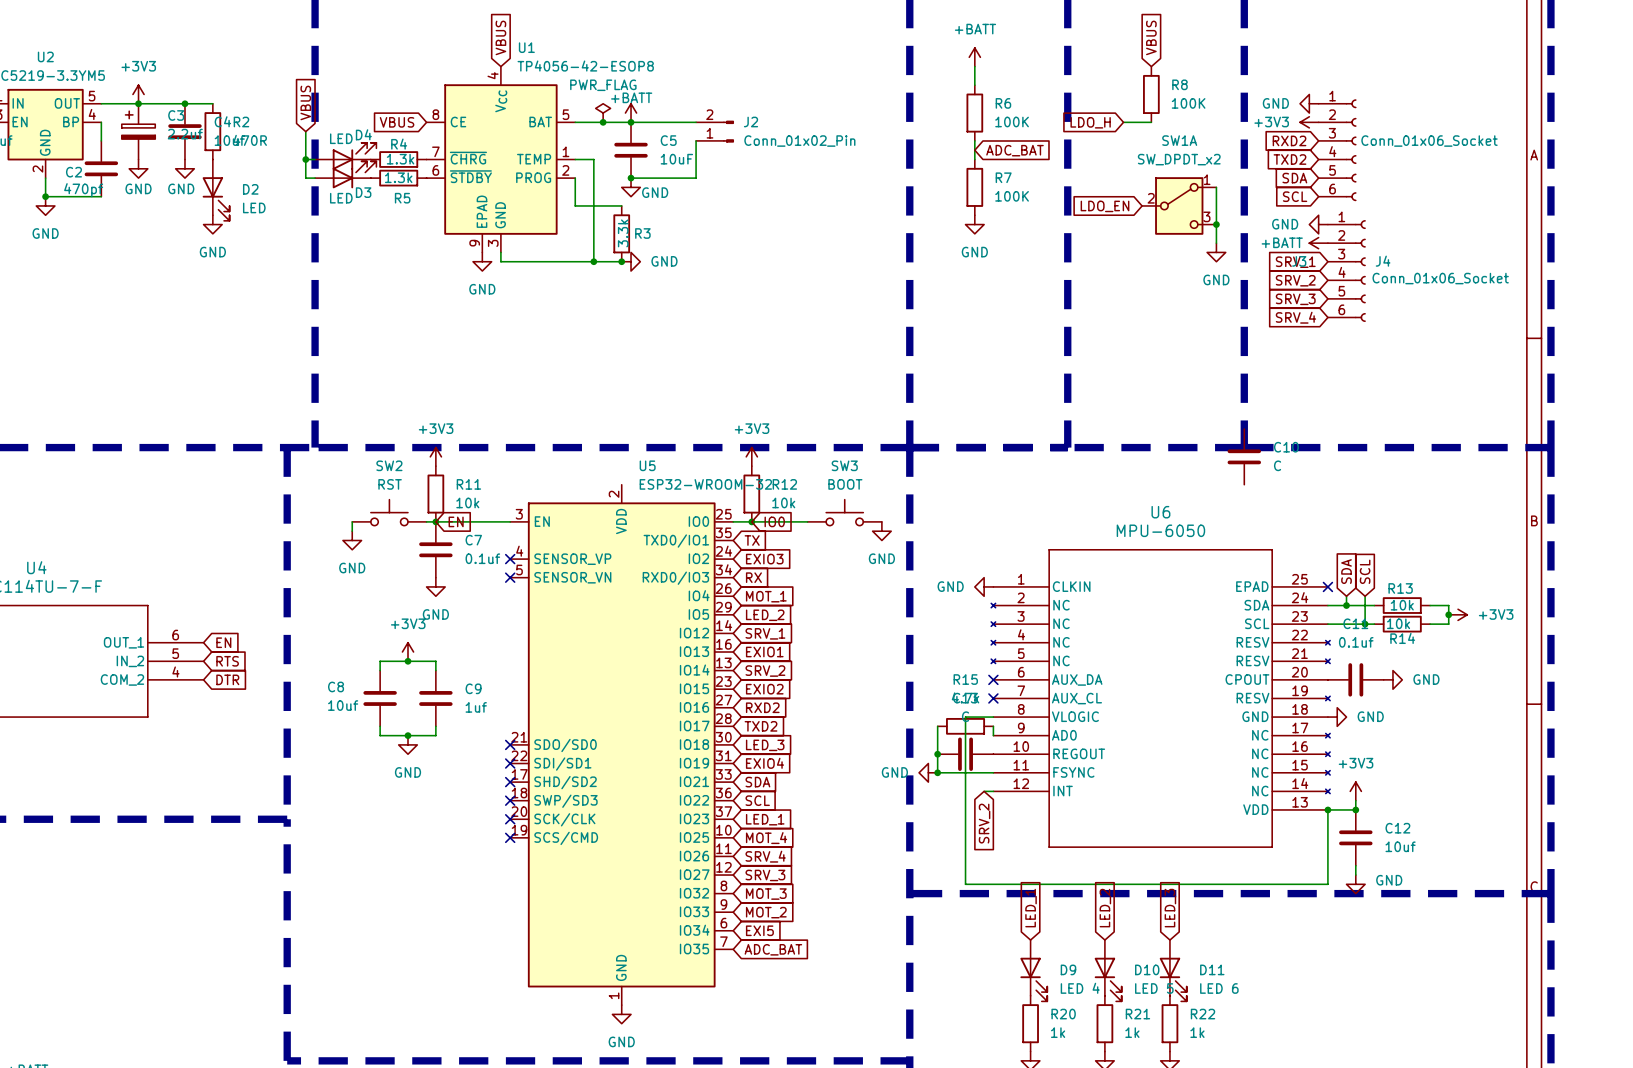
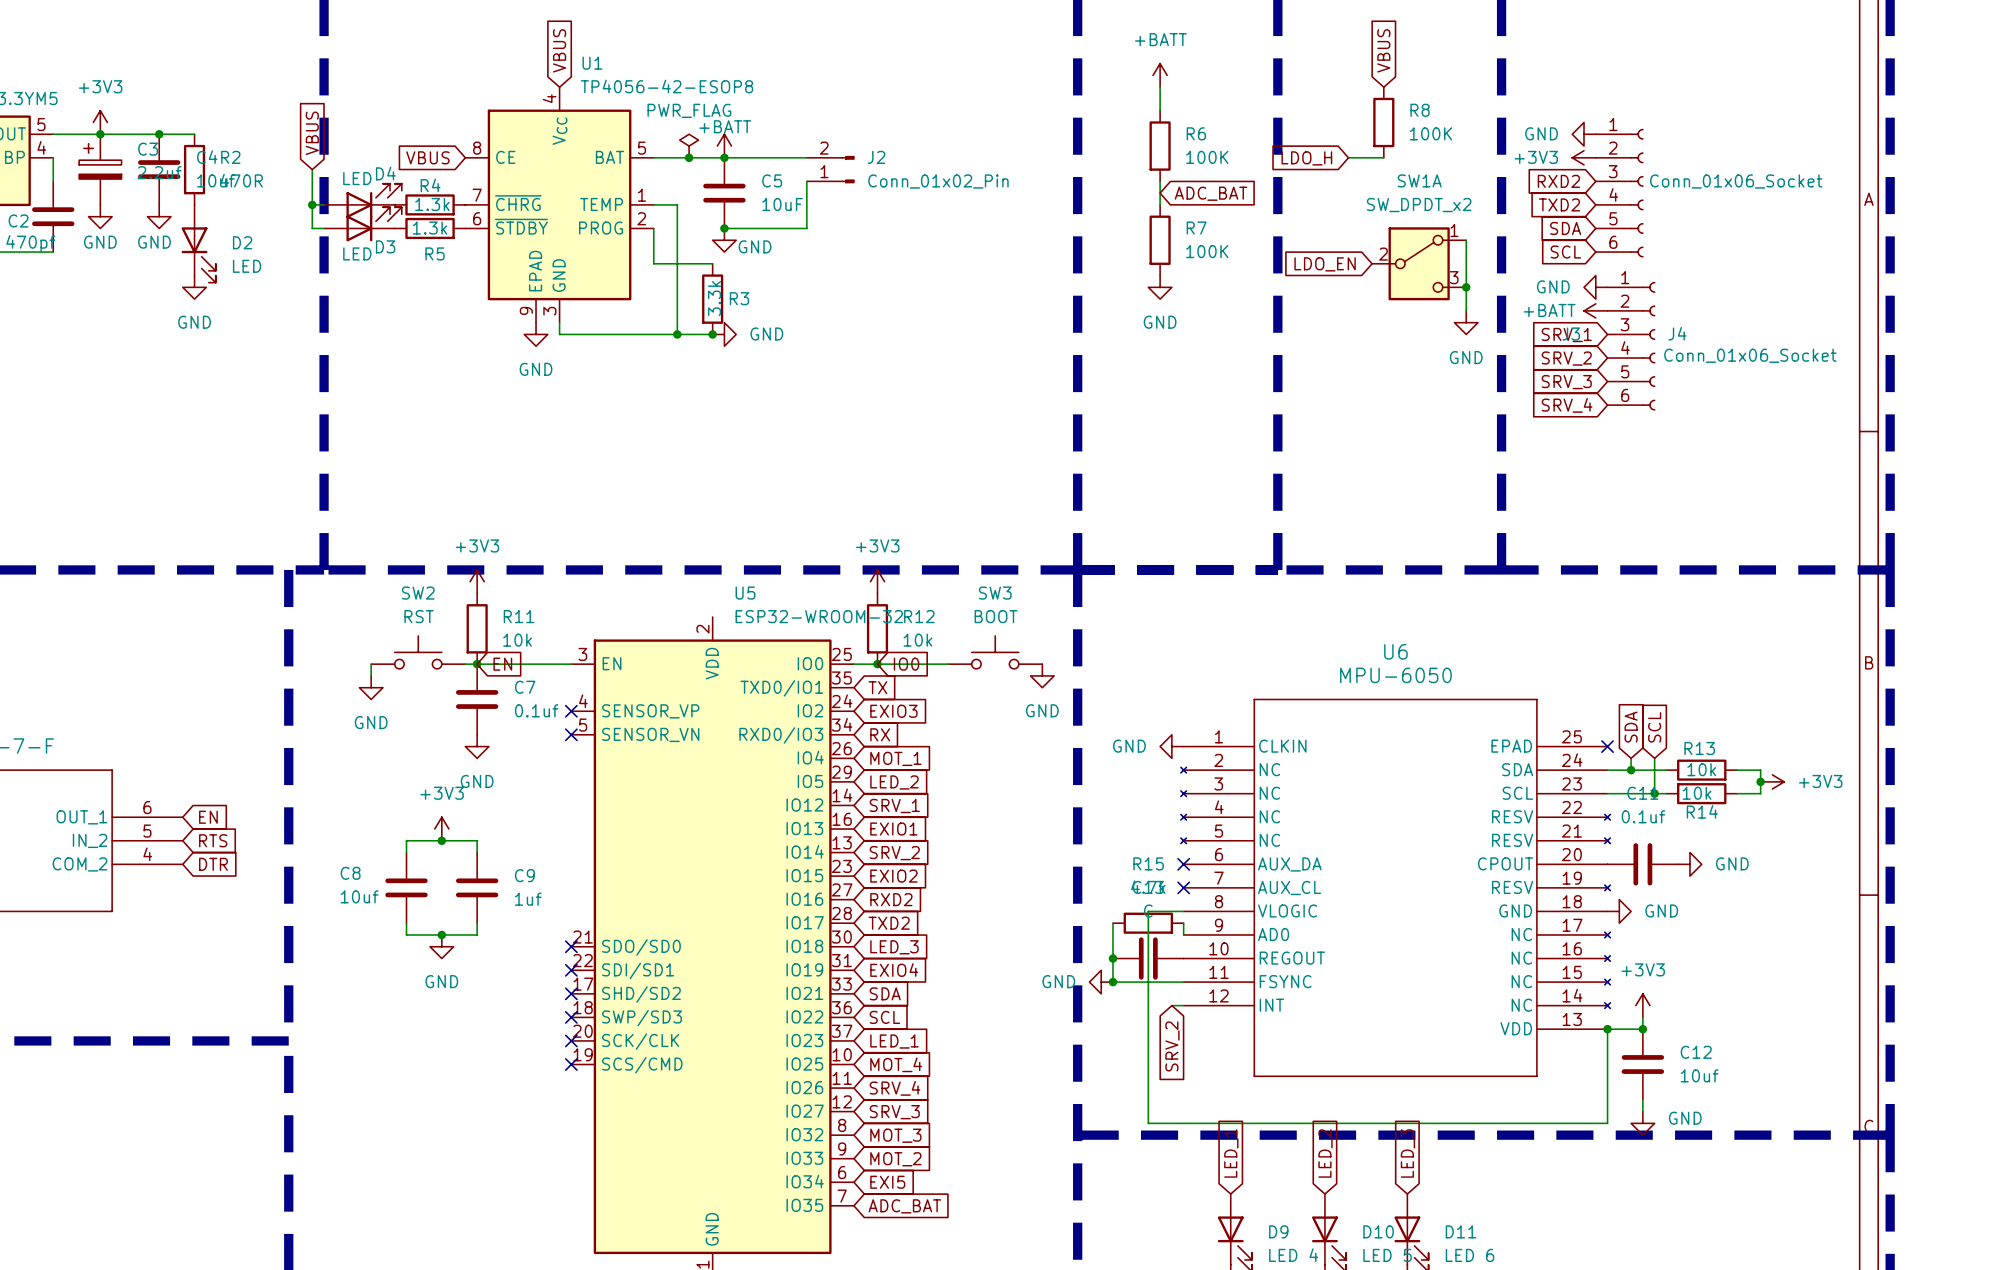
C10: C (1244, 456) -> none

